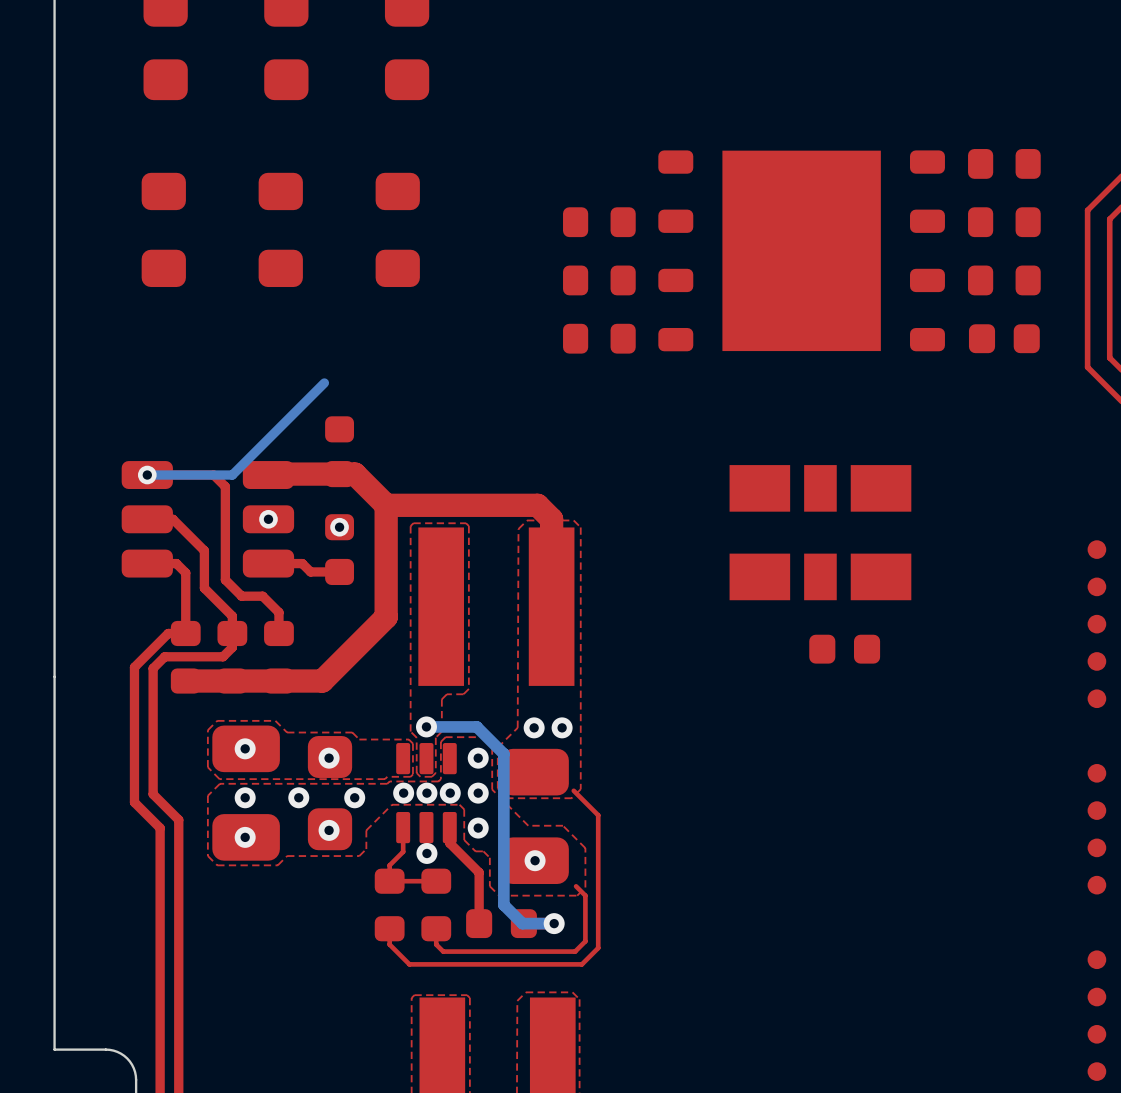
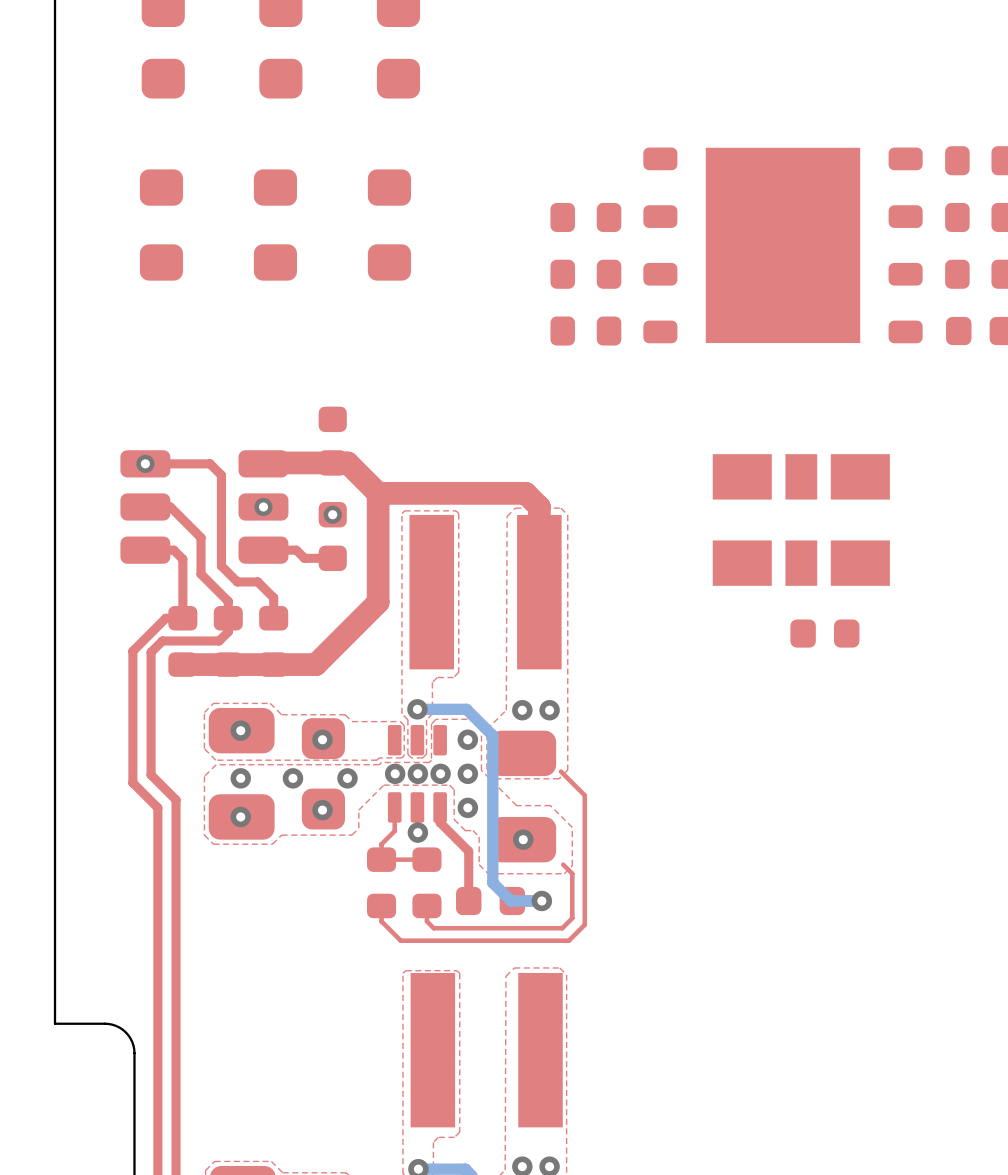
bottom track: (324, 382) (232, 475) (147, 475) -> none

